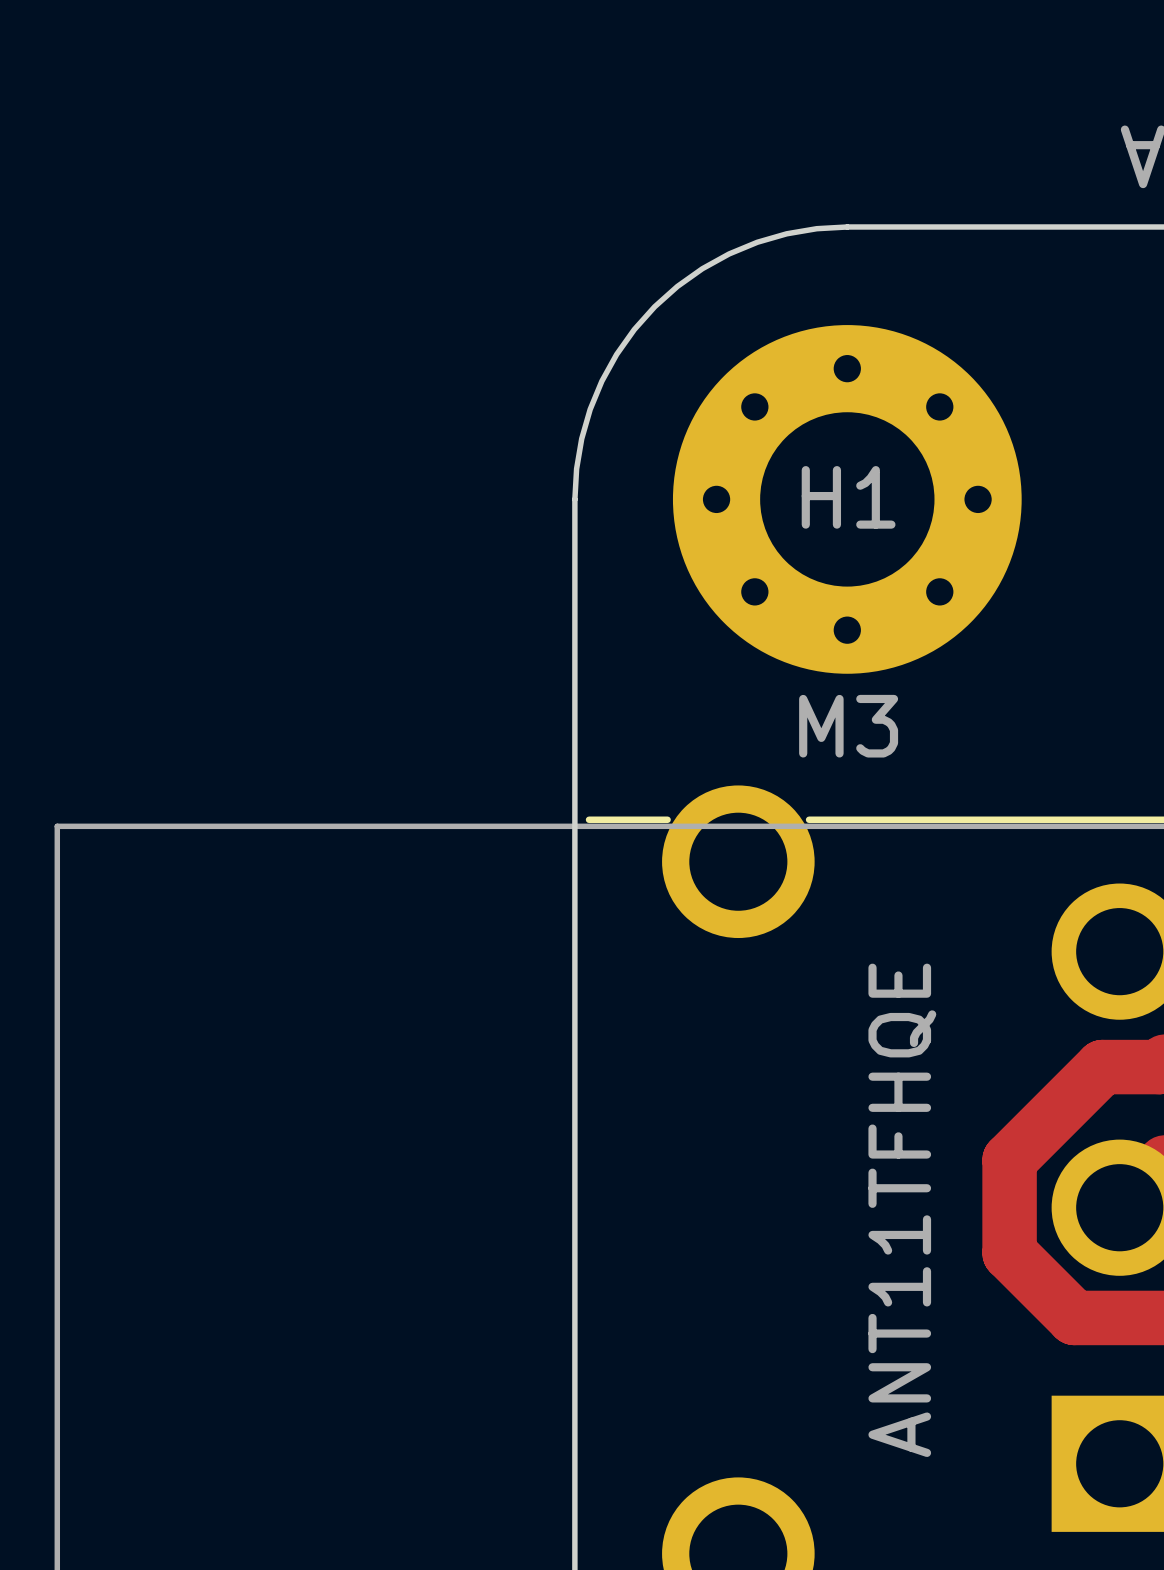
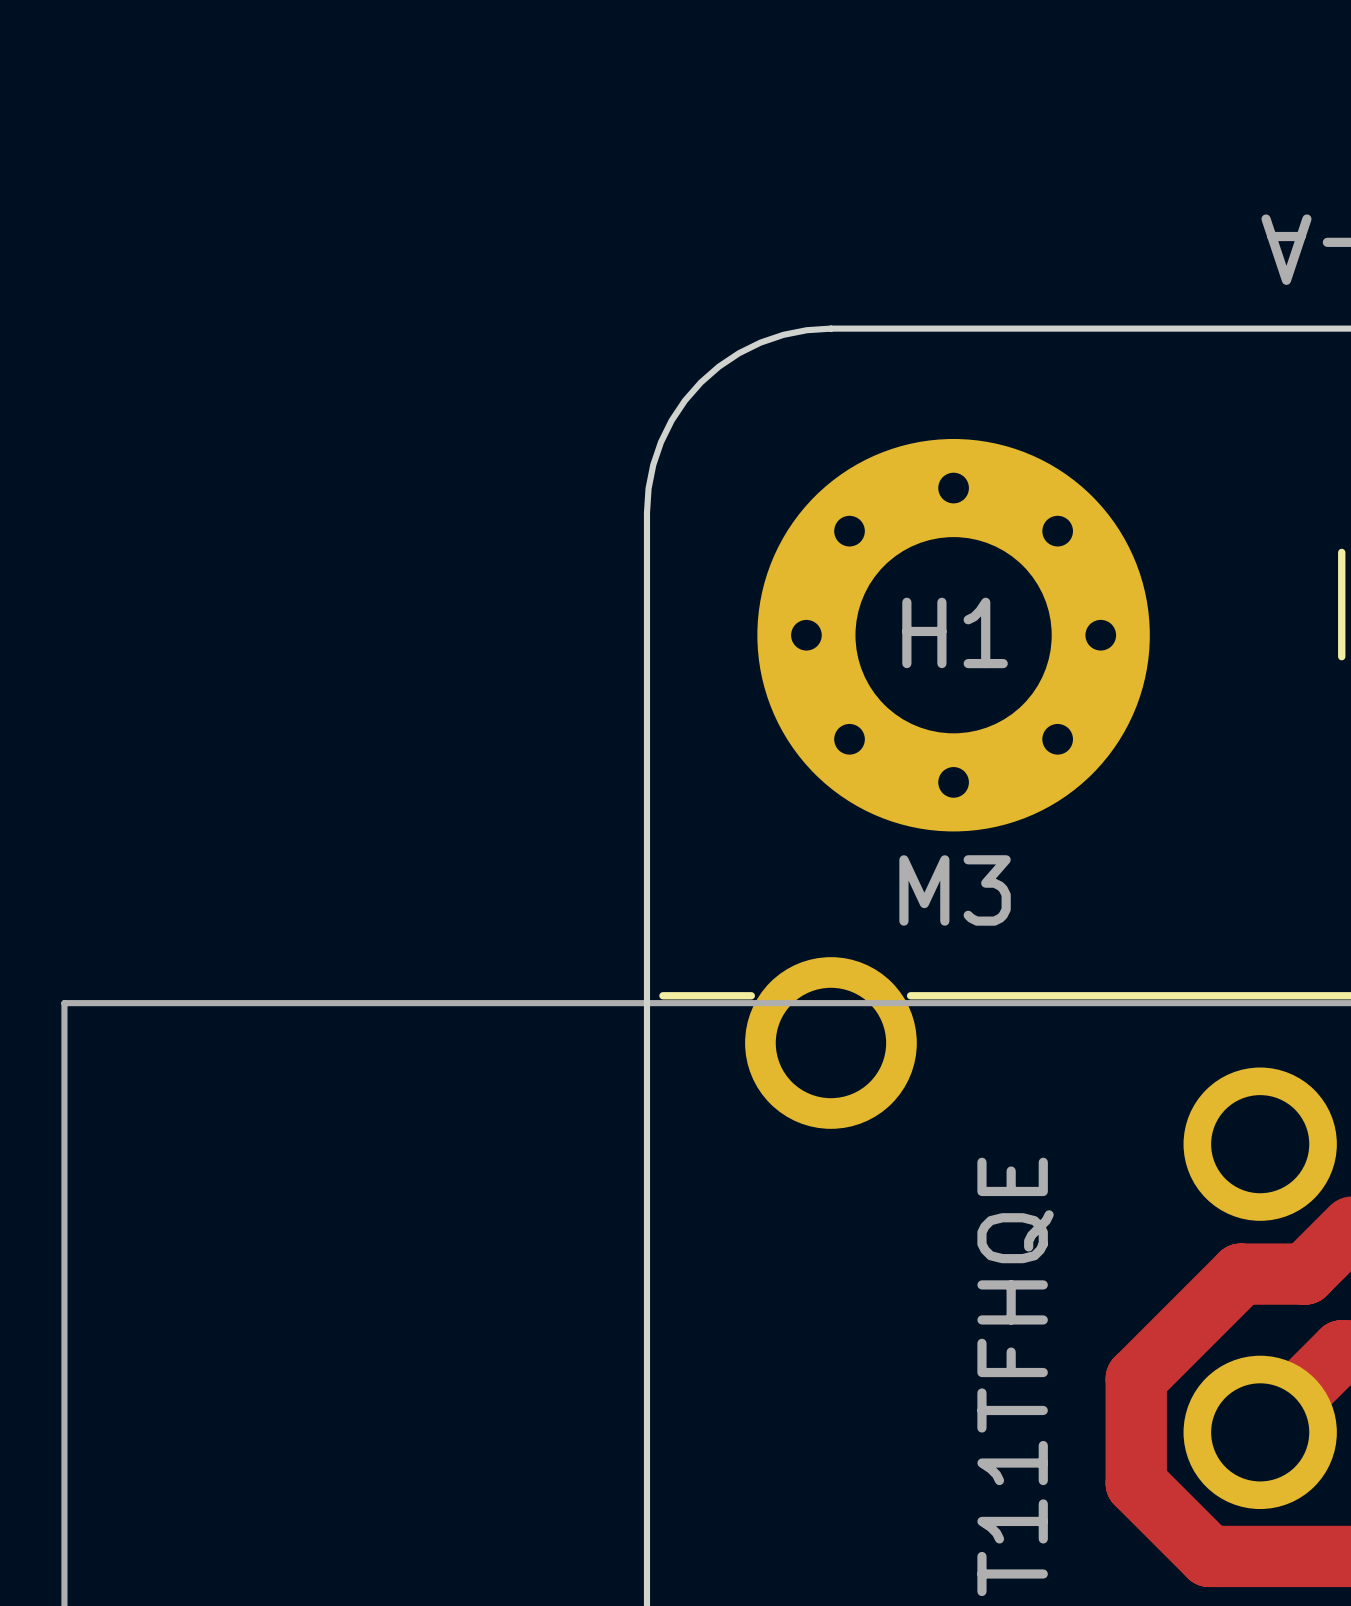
board edge: (847, 226) (816, 228) (786, 233) (757, 242) (729, 253) (702, 268) (677, 286) (654, 306) (634, 329) (616, 354) (601, 381) (590, 409) (581, 438) (576, 468) (574, 499) -> (953, 328) (830, 328) (806, 330) (783, 334) (760, 342) (738, 353) (718, 366) (700, 382) (685, 400) (671, 420) (660, 442) (653, 464) (648, 488) (646, 512) (646, 635)

